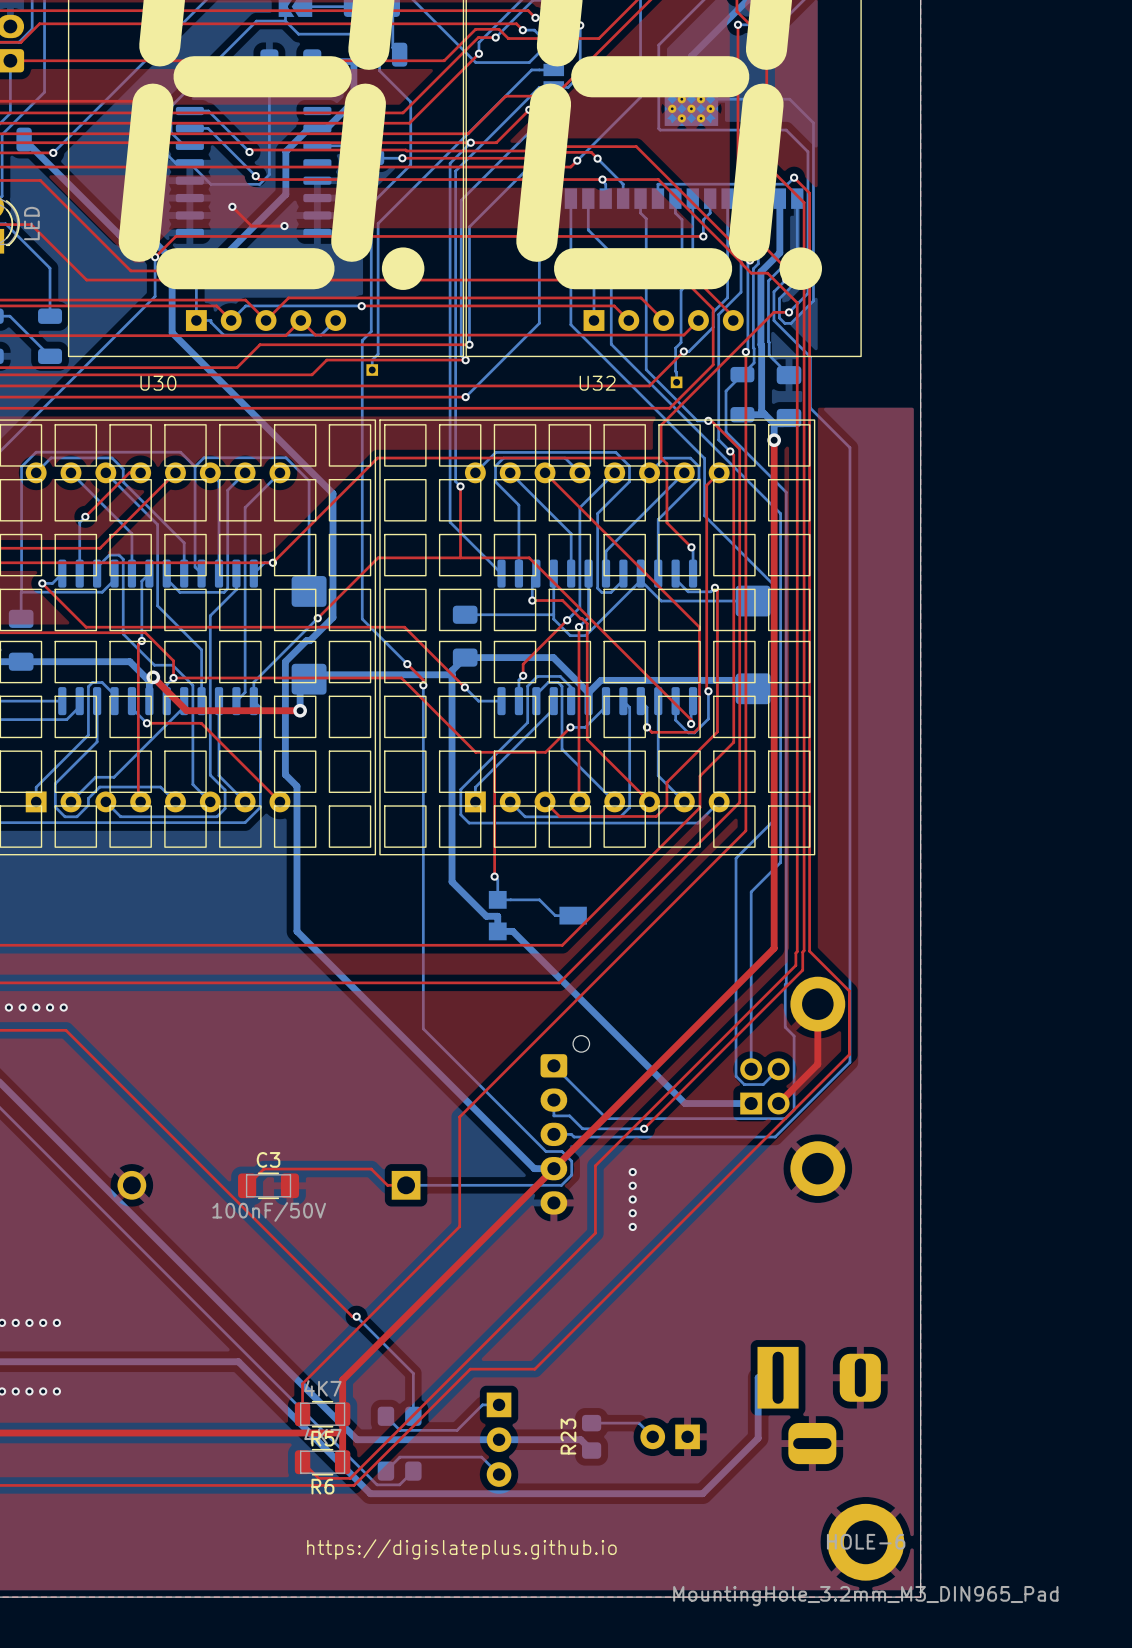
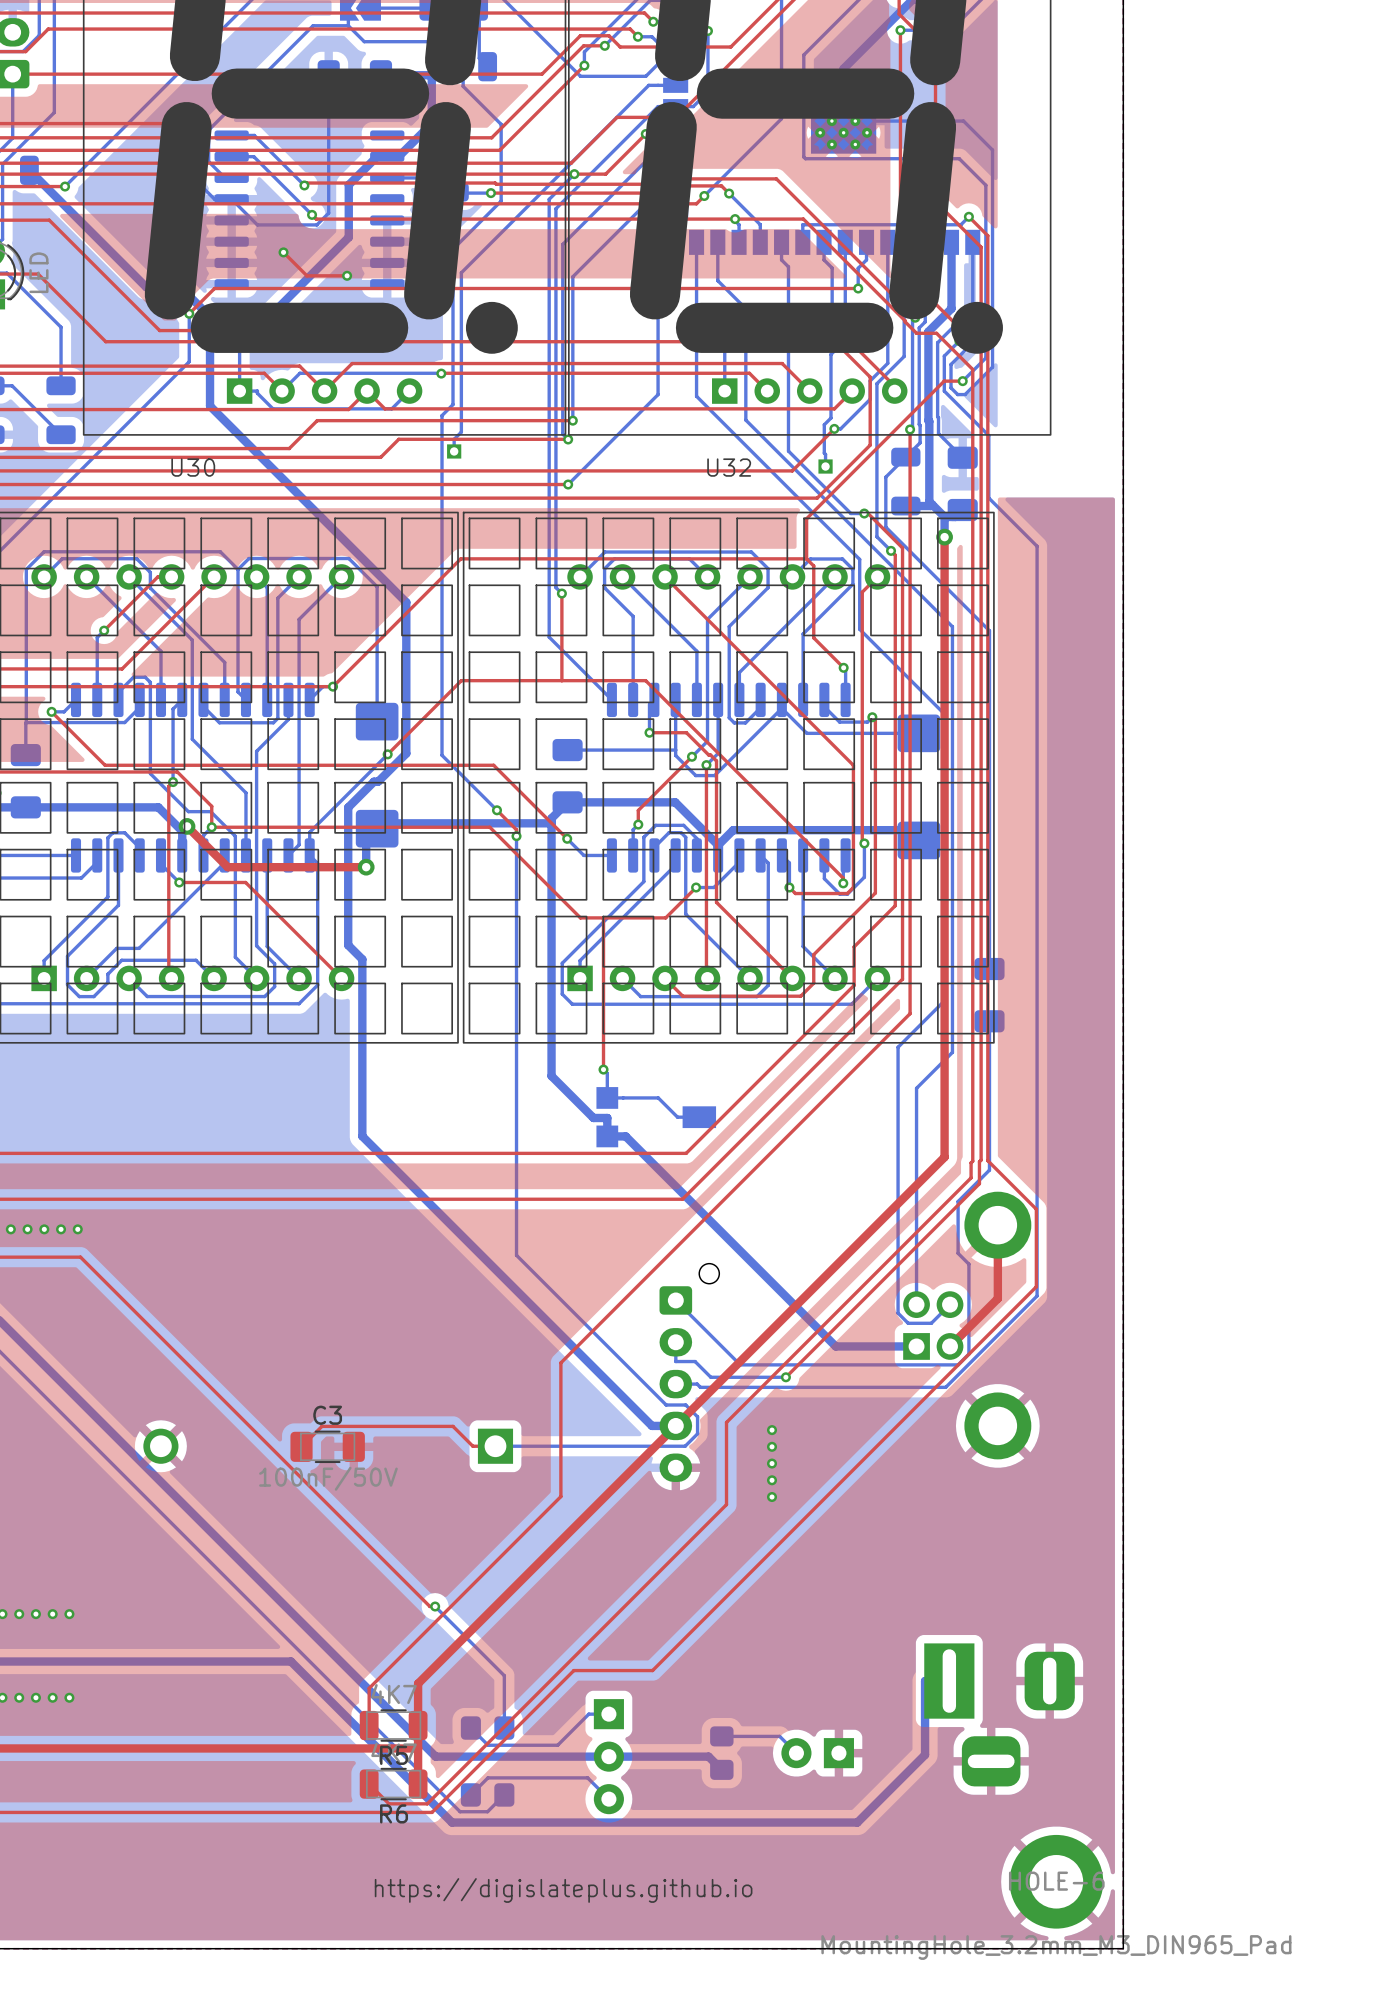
bottom track: (786, 492) (786, 983) -> (959, 600) (989, 630) (989, 969)
part: none -> (989, 995)
bottom track: none -> (989, 1021) (989, 1170) (959, 1200)
R23 name: R23 (568, 1436) -> none

